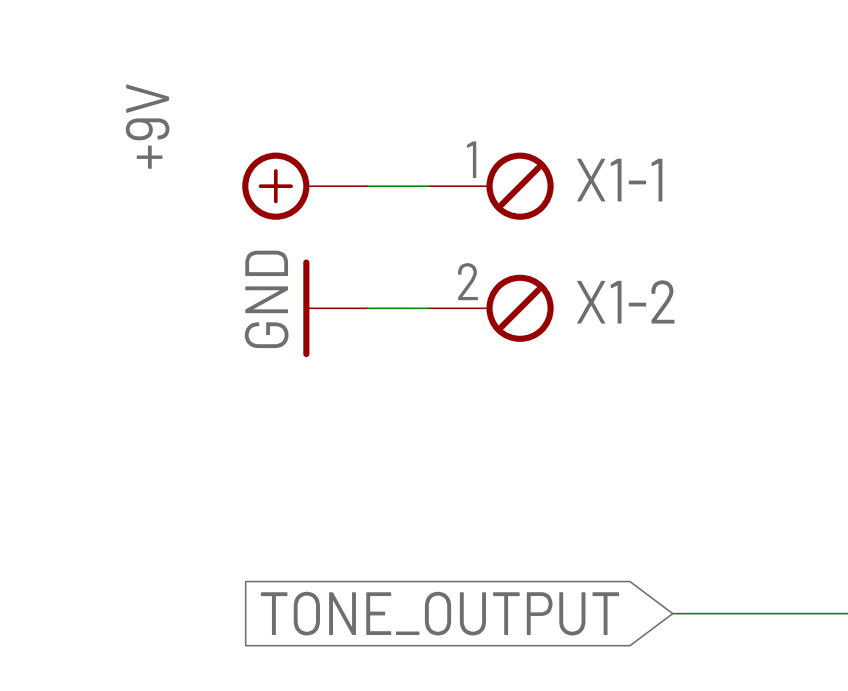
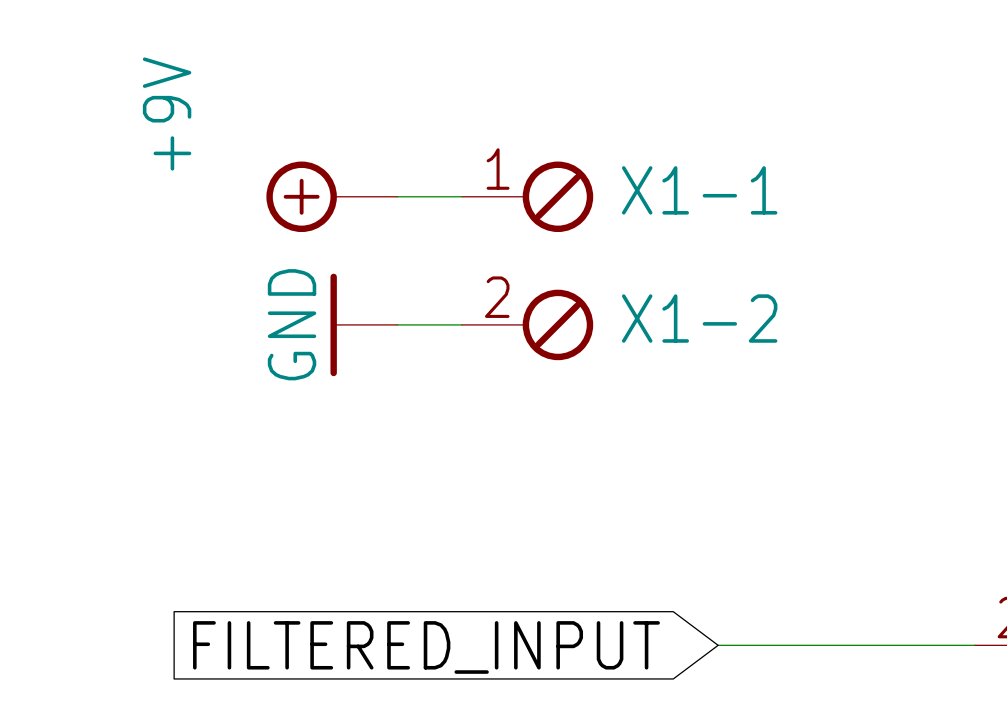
global label: TONE_OUTPUT (439, 613) -> FILTERED_INPUT (426, 647)

